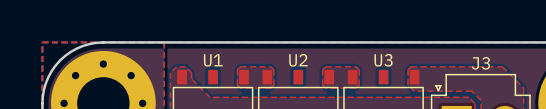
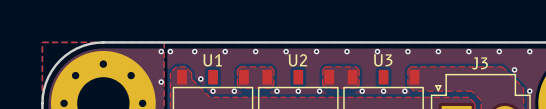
via: none -> (161, 51)
via: none -> (170, 51)
via: none -> (194, 51)
via: none -> (225, 51)
via: none -> (255, 51)
via: none -> (286, 51)
via: none -> (316, 51)
via: none -> (347, 51)
via: none -> (377, 51)
via: none -> (407, 51)
via: none -> (438, 51)
via: none -> (468, 51)
via: none -> (499, 51)
via: none -> (529, 51)
via: none -> (514, 69)
via: none -> (200, 79)
via: none -> (161, 82)
via: none -> (213, 91)
via: none -> (234, 91)
via: none -> (276, 91)
via: none -> (298, 91)
via: none -> (319, 91)
via: none -> (362, 91)
via: none -> (383, 91)
via: none -> (404, 91)
via: none -> (529, 91)

